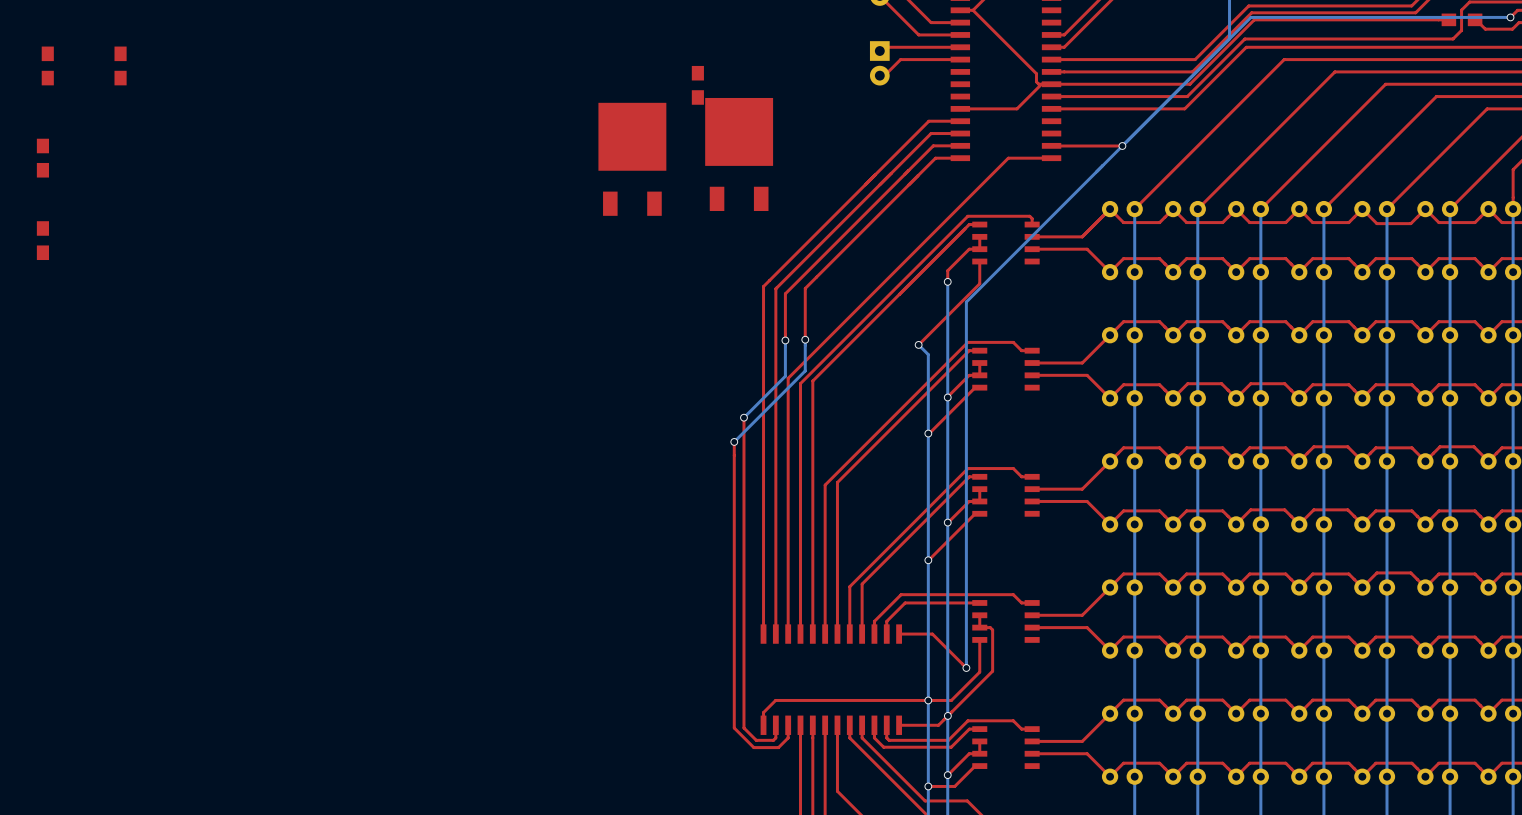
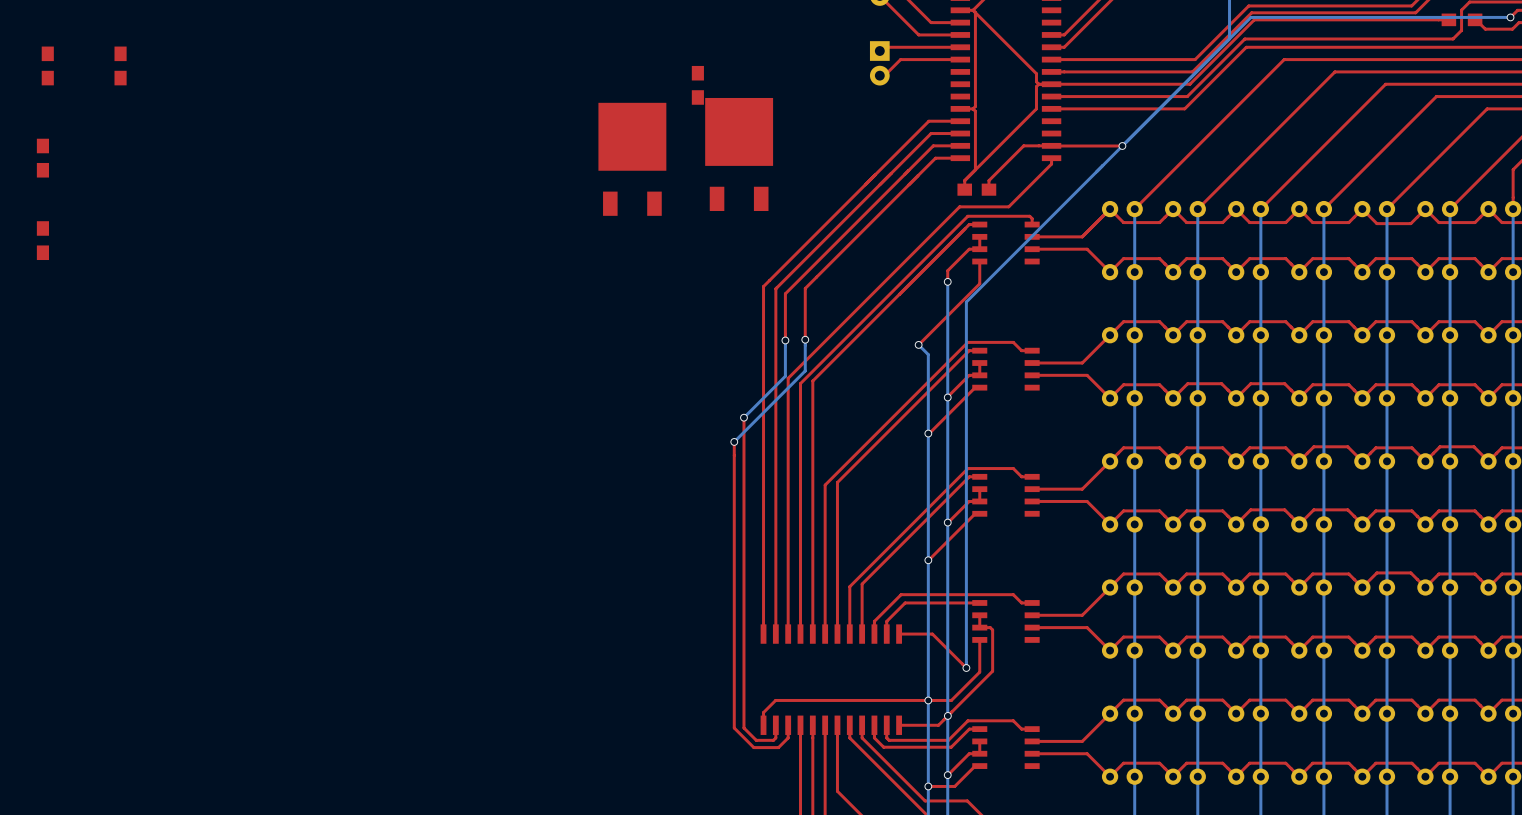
top track: none -> (975, 12) (975, 106) (973, 108) (975, 111) (975, 169)
top track: none -> (1038, 84) (1036, 86) (1036, 108) (964, 180) (964, 189)
top track: (1041, 84) (1016, 108) (973, 108) -> none
top track: none -> (1051, 145) (1023, 145) (988, 180) (988, 189)
top track: (1051, 158) (1008, 158) (959, 206) -> (1051, 158) (1051, 164) (1008, 206) (959, 206)
part: none -> (976, 189)

